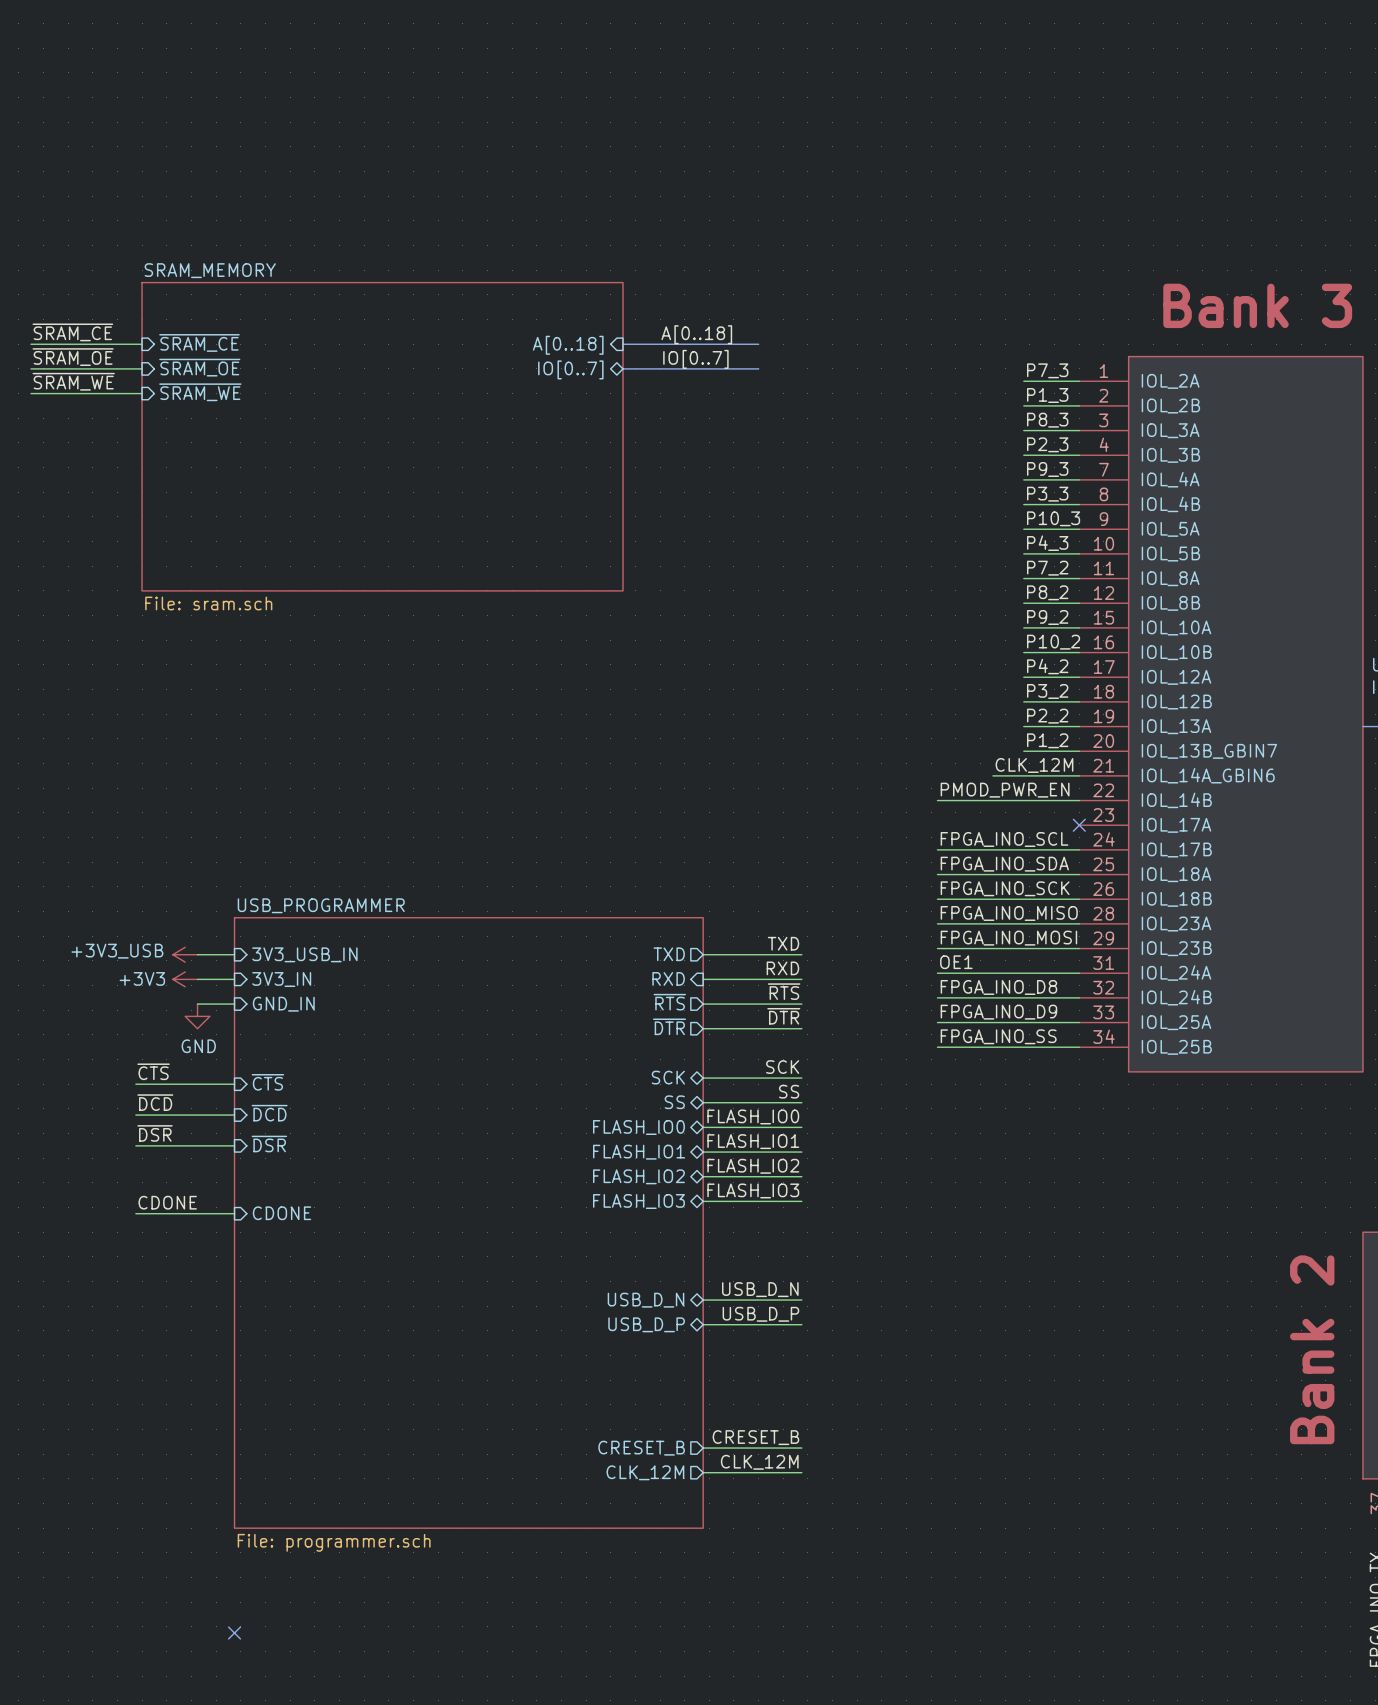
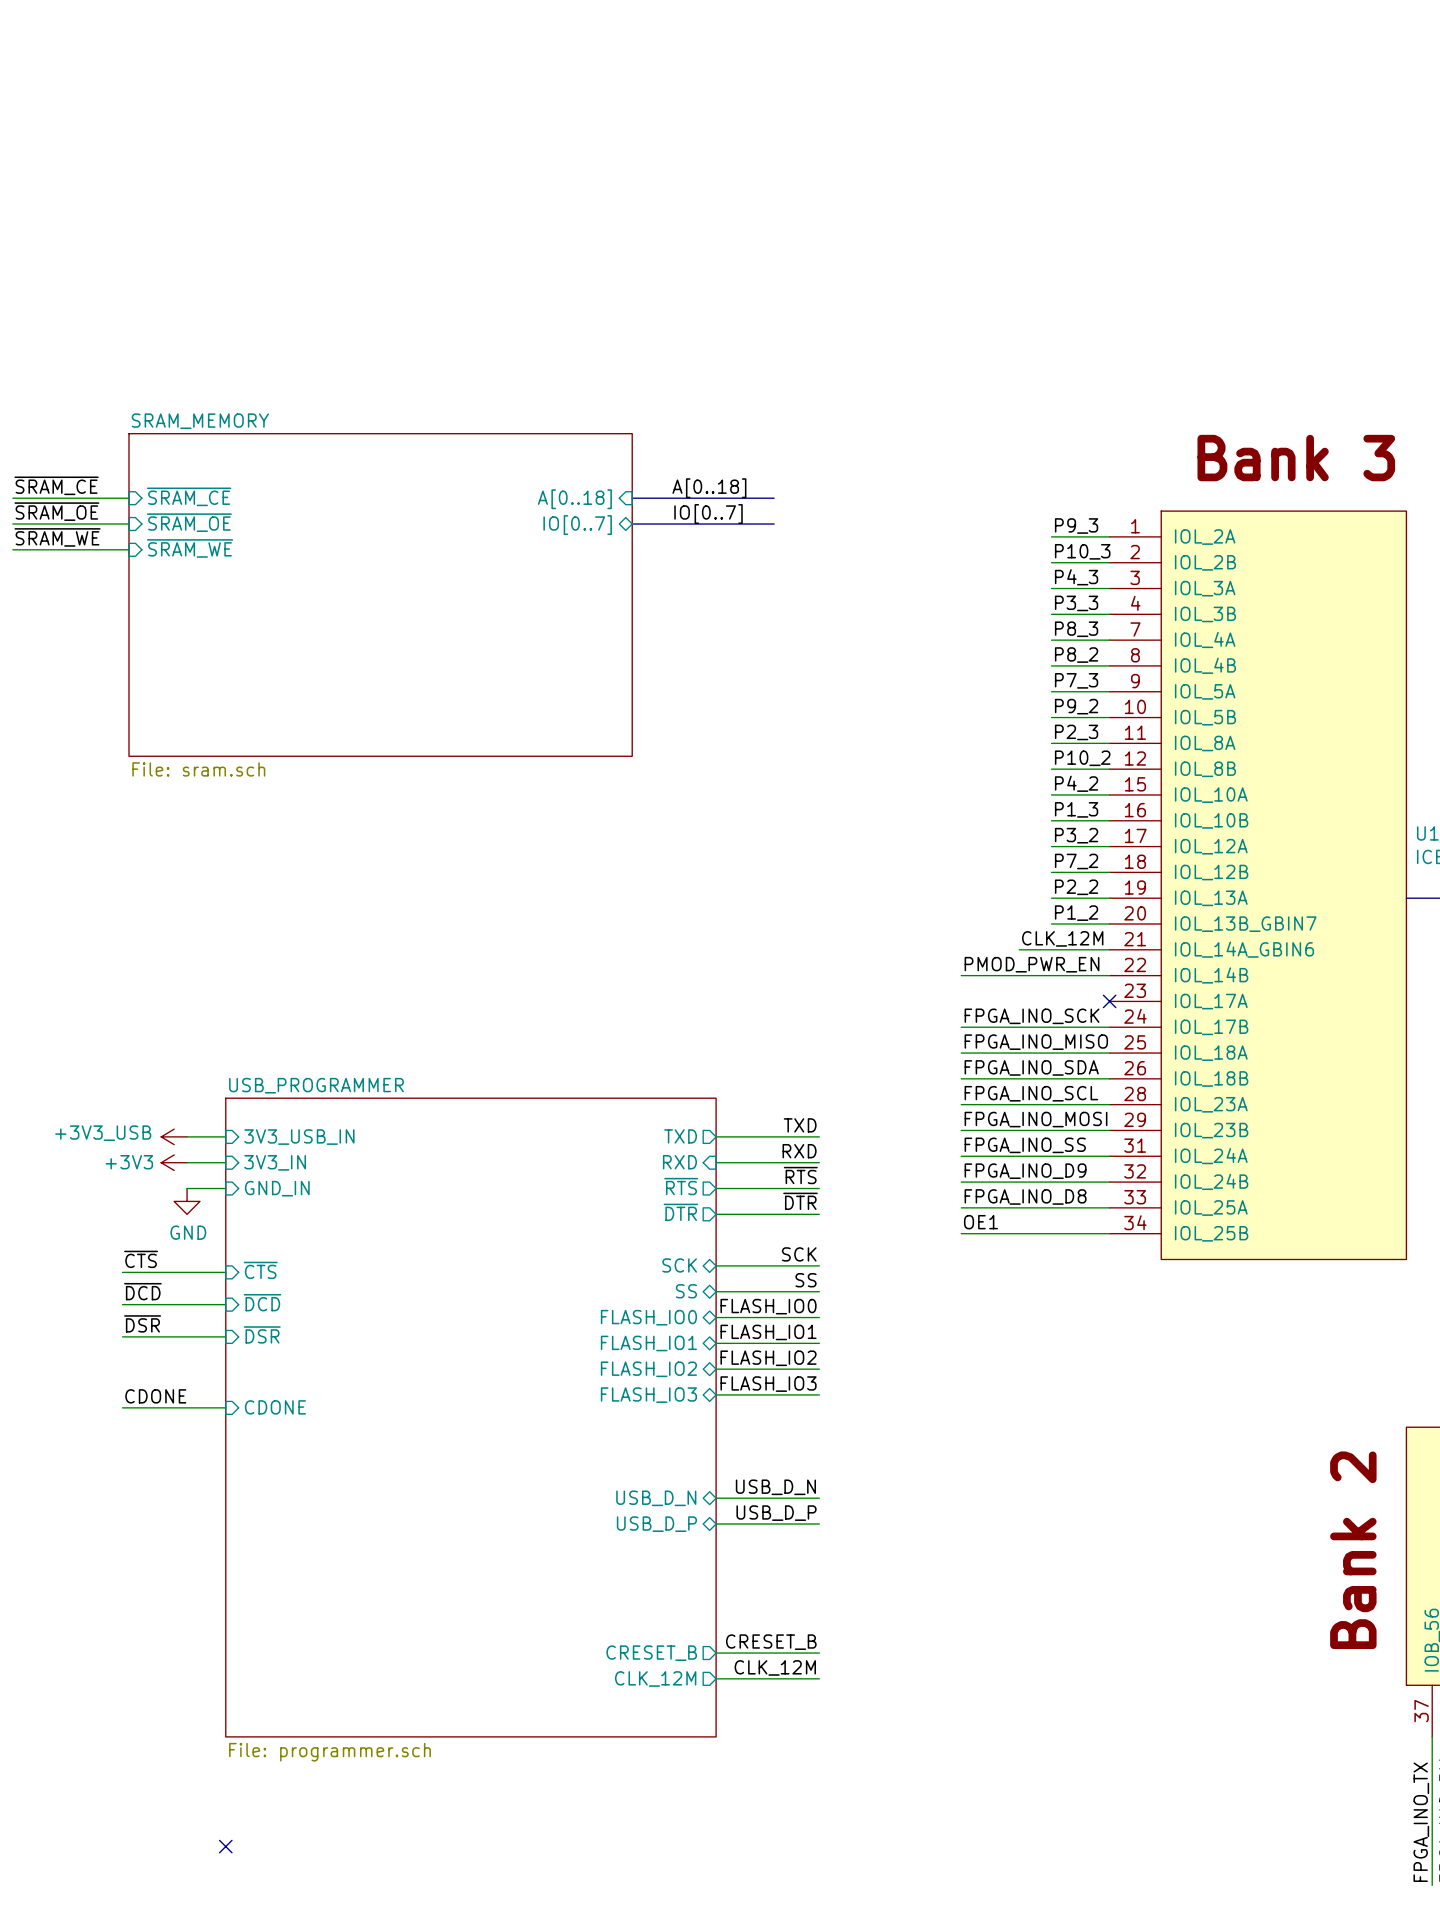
label: P7_3 (1047, 370) -> P9_3 (1076, 526)
label: P1_3 (1047, 395) -> P10_3 (1082, 551)
label: P8_3 (1047, 420) -> P4_3 (1076, 577)
label: P2_3 (1047, 444) -> P3_3 (1076, 603)
label: P9_3 (1047, 469) -> P8_3 (1076, 629)
label: P3_3 (1047, 494) -> P8_2 (1076, 655)
label: P10_3 (1053, 518) -> P7_3 (1076, 680)
label: P4_3 (1047, 543) -> P9_2 (1076, 706)
label: P7_2 (1047, 568) -> P2_3 (1076, 732)
label: P8_2 (1047, 592) -> P10_2 (1082, 758)
label: P9_2 (1047, 617) -> P4_2 (1076, 783)
label: P10_2 (1053, 642) -> P1_3 (1076, 809)
label: P4_2 (1047, 666) -> P3_2 (1076, 835)
label: P3_2 (1047, 691) -> P7_2 (1076, 861)
label: FPGA_INO_SCL (1004, 839) -> FPGA_INO_SCK (1032, 1016)
label: FPGA_INO_SDA (1004, 864) -> FPGA_INO_MISO (1036, 1042)
label: FPGA_INO_SCK (1005, 888) -> FPGA_INO_SDA (1031, 1067)
label: FPGA_INO_MISO (1009, 913) -> FPGA_INO_SCL (1031, 1093)
label: OE1 (956, 962) -> FPGA_INO_SS (1025, 1145)
label: FPGA_INO_D8 (998, 987) -> FPGA_INO_D9 (1025, 1171)
label: FPGA_INO_D9 (998, 1012) -> FPGA_INO_D8 (1025, 1196)
label: FPGA_INO_SS (998, 1036) -> OE1 (981, 1222)

